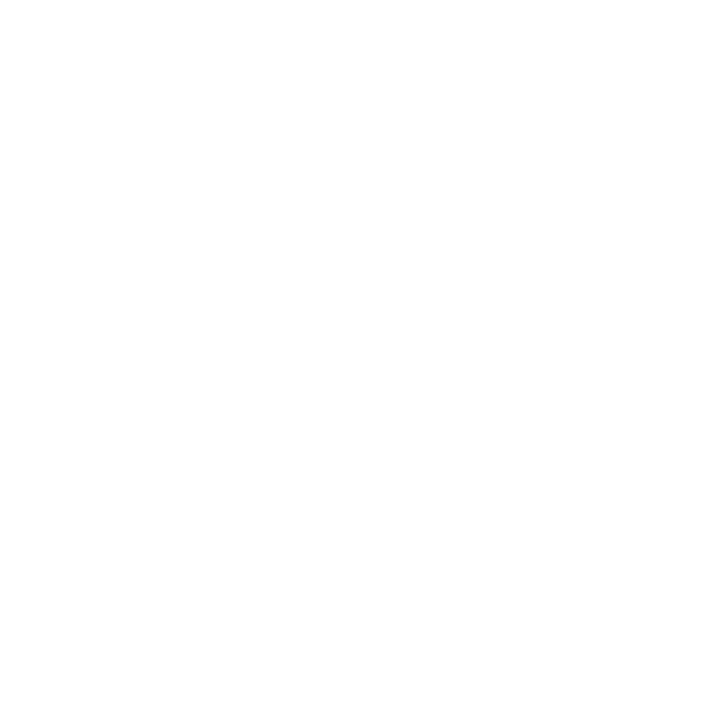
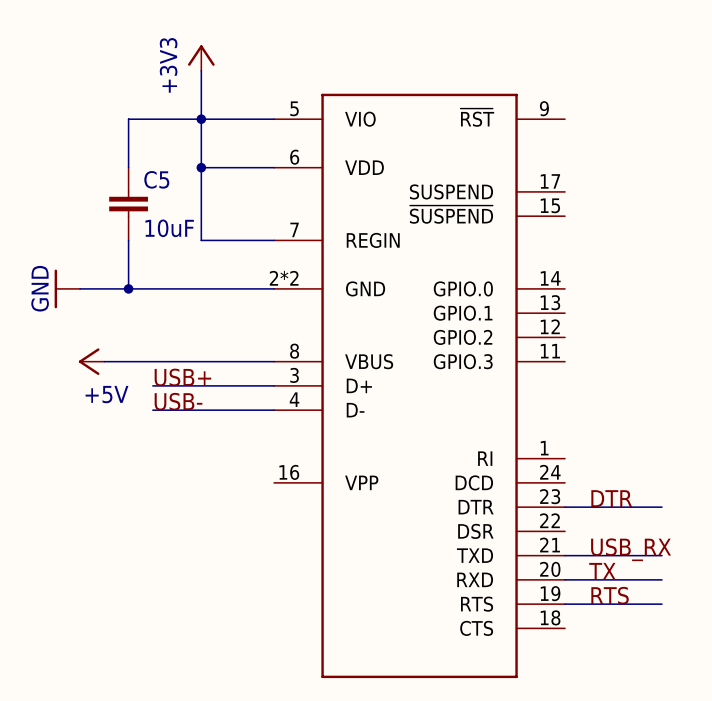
power symbol: none -> +3V3 (201, 57)
wire: none -> (201, 70) (201, 240) (274, 240)
junction: none -> (201, 119)
wire: none -> (274, 119) (128, 119) (128, 167)
wire: none -> (201, 167) (274, 167)
junction: none -> (201, 167)
C5: none -> 10uF (128, 204)
wire: none -> (128, 240) (128, 288)
power symbol: none -> GND (67, 288)
wire: none -> (80, 288) (274, 288)
junction: none -> (128, 288)
power symbol: none -> +5V (91, 361)
wire: none -> (104, 361) (274, 361)
label: none -> USB+ (182, 377)
wire: none -> (152, 385) (274, 385)
part: none -> (419, 385)
label: none -> USB- (178, 401)
wire: none -> (152, 410) (274, 410)
label: none -> DTR (611, 498)
wire: none -> (565, 507) (662, 507)
label: none -> USB_RX (631, 549)
wire: none -> (565, 555) (662, 555)
label: none -> TX (602, 571)
wire: none -> (565, 579) (662, 579)
label: none -> RTS (610, 595)
wire: none -> (565, 604) (662, 604)

